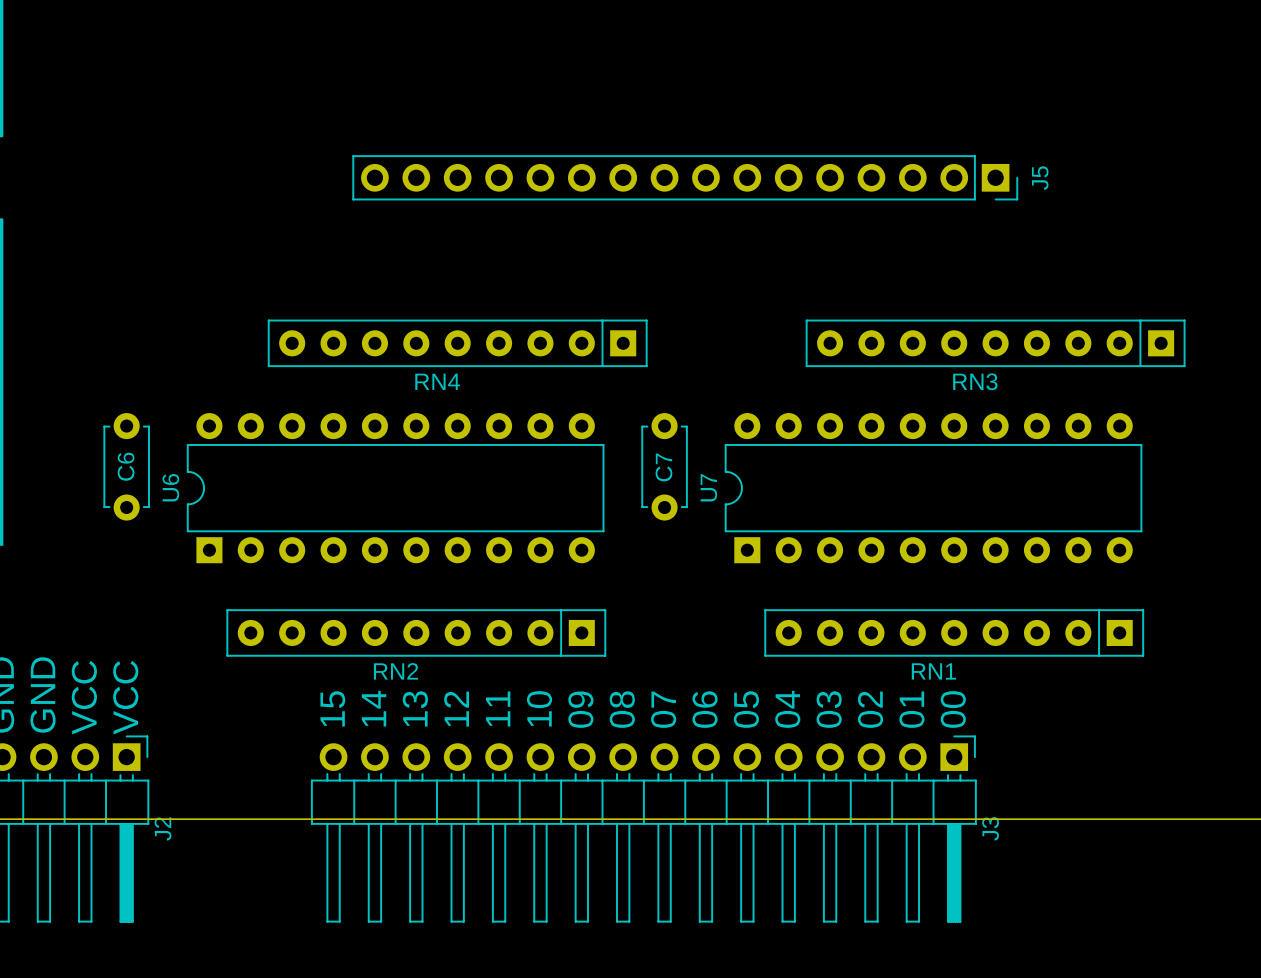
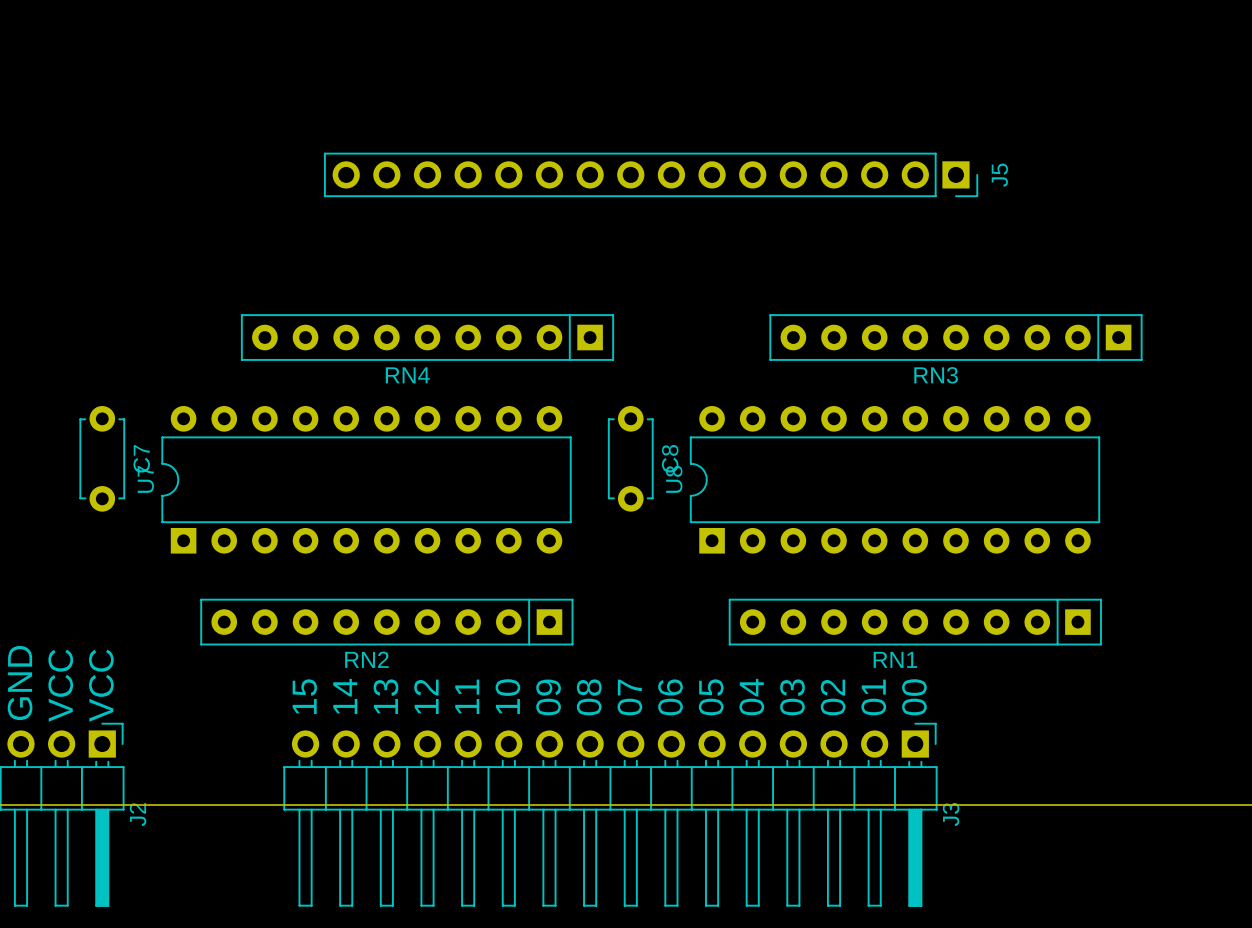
C6 name: C6 (126, 466) -> C7 (141, 458)
C7 name: C7 (663, 467) -> C8 (670, 458)
U6 name: U6 (170, 487) -> U7 (145, 479)
U7 name: U7 (708, 487) -> U8 (674, 479)

